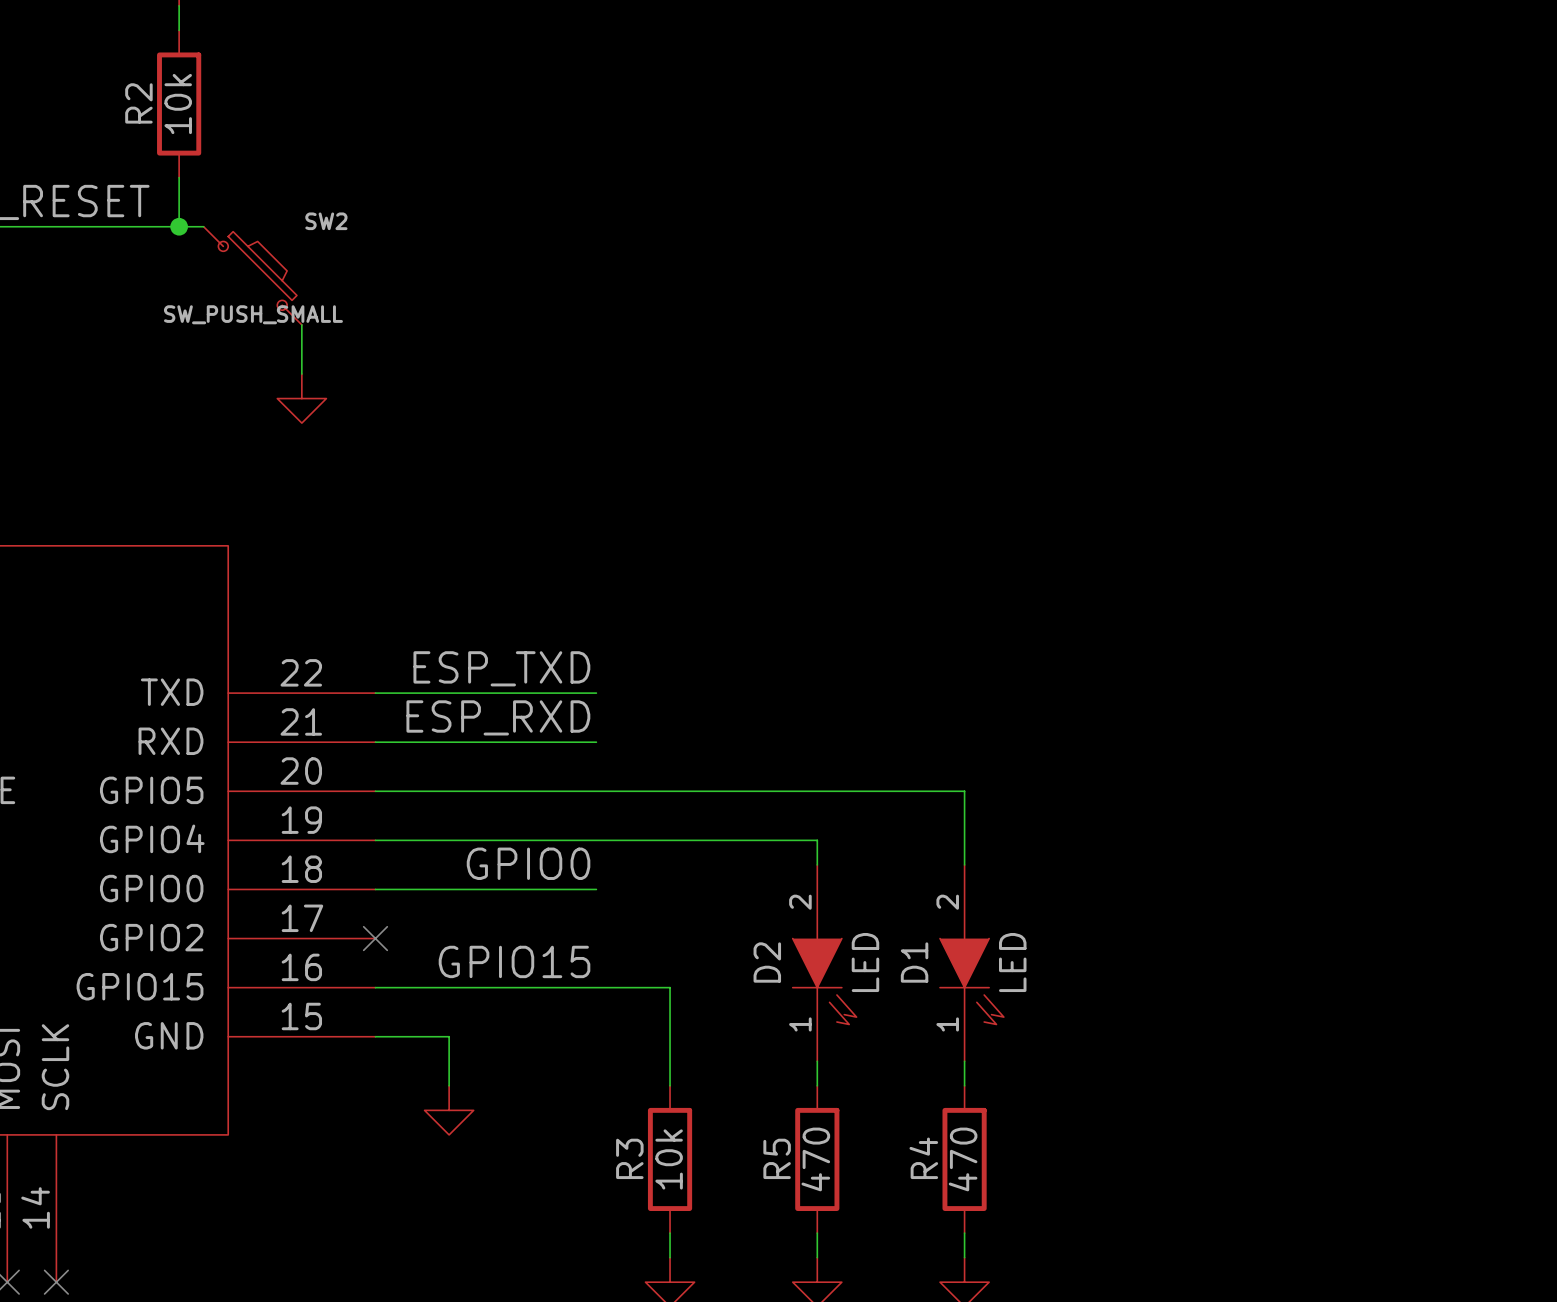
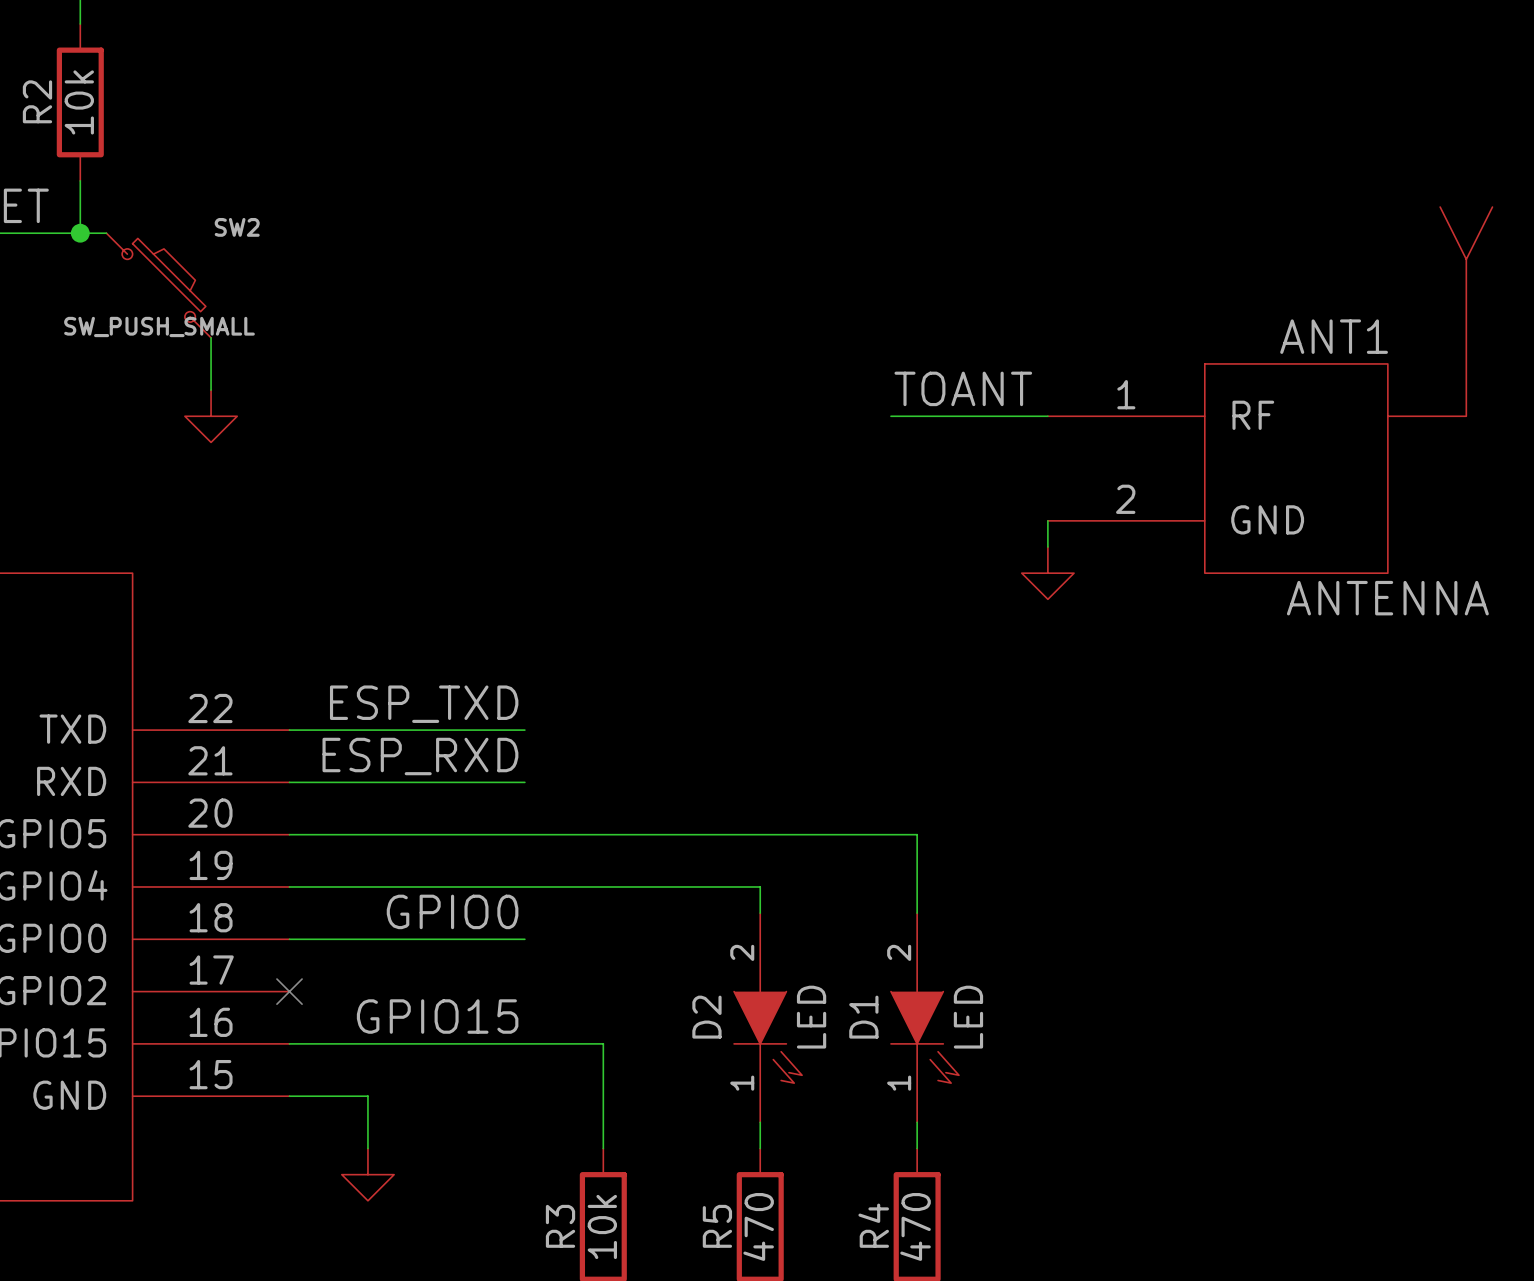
label: none -> TOANT (963, 388)
ANT1: none -> ANTENNA (1270, 390)
wire: none -> (890, 416) (1047, 416)
wire: none -> (1047, 520) (1047, 547)
power symbol: none -> (1047, 573)

